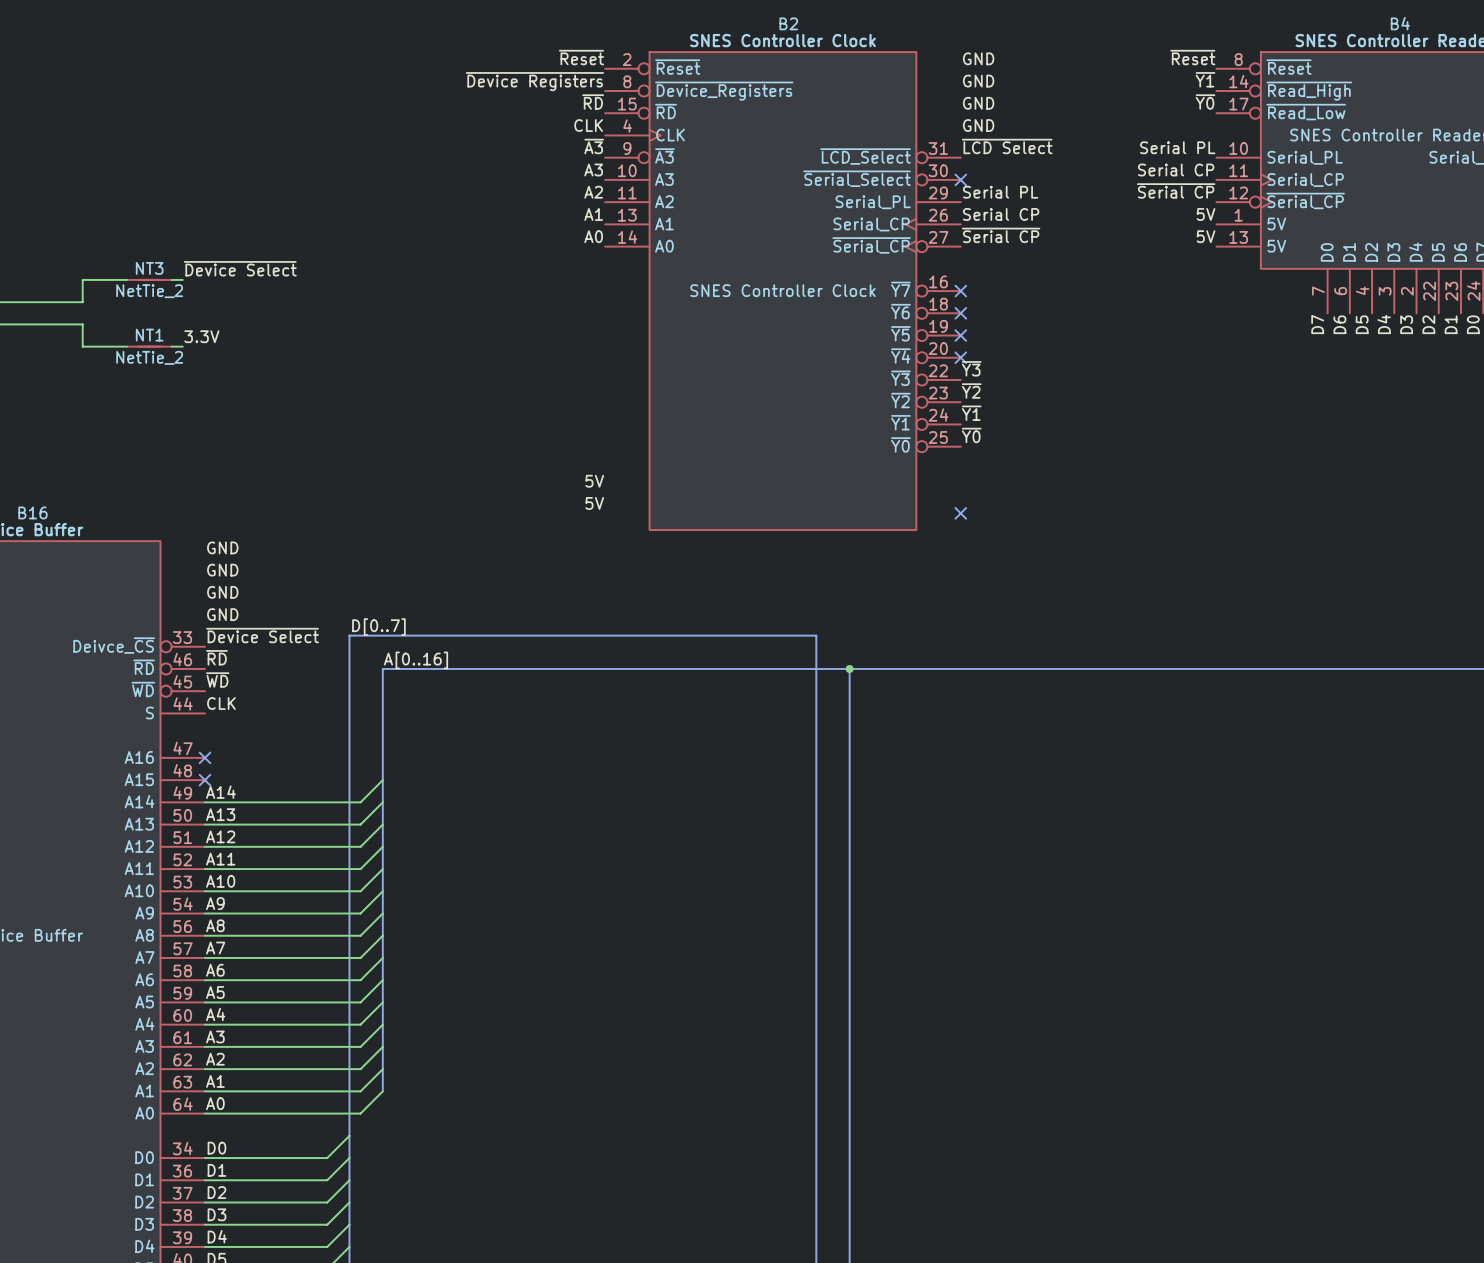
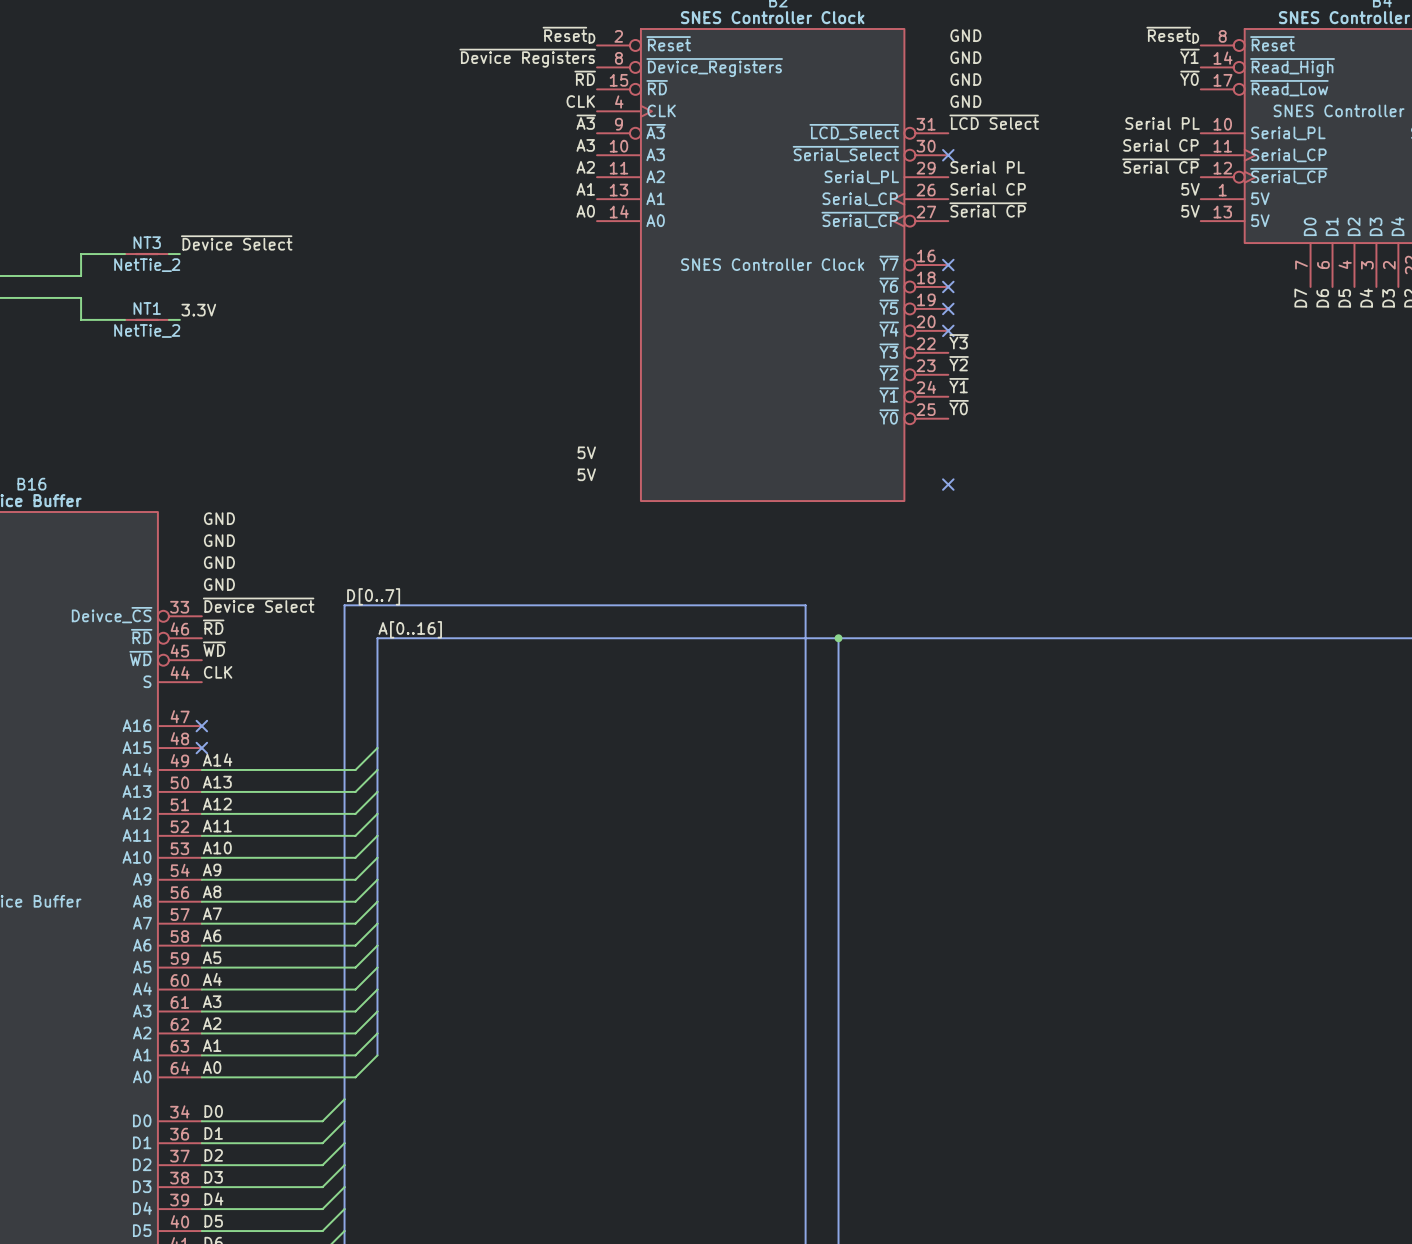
label: ~{Reset} (581, 57) -> ~{Reset}D (569, 35)
label: ~{Reset} (1192, 57) -> ~{Reset}D (1172, 35)

